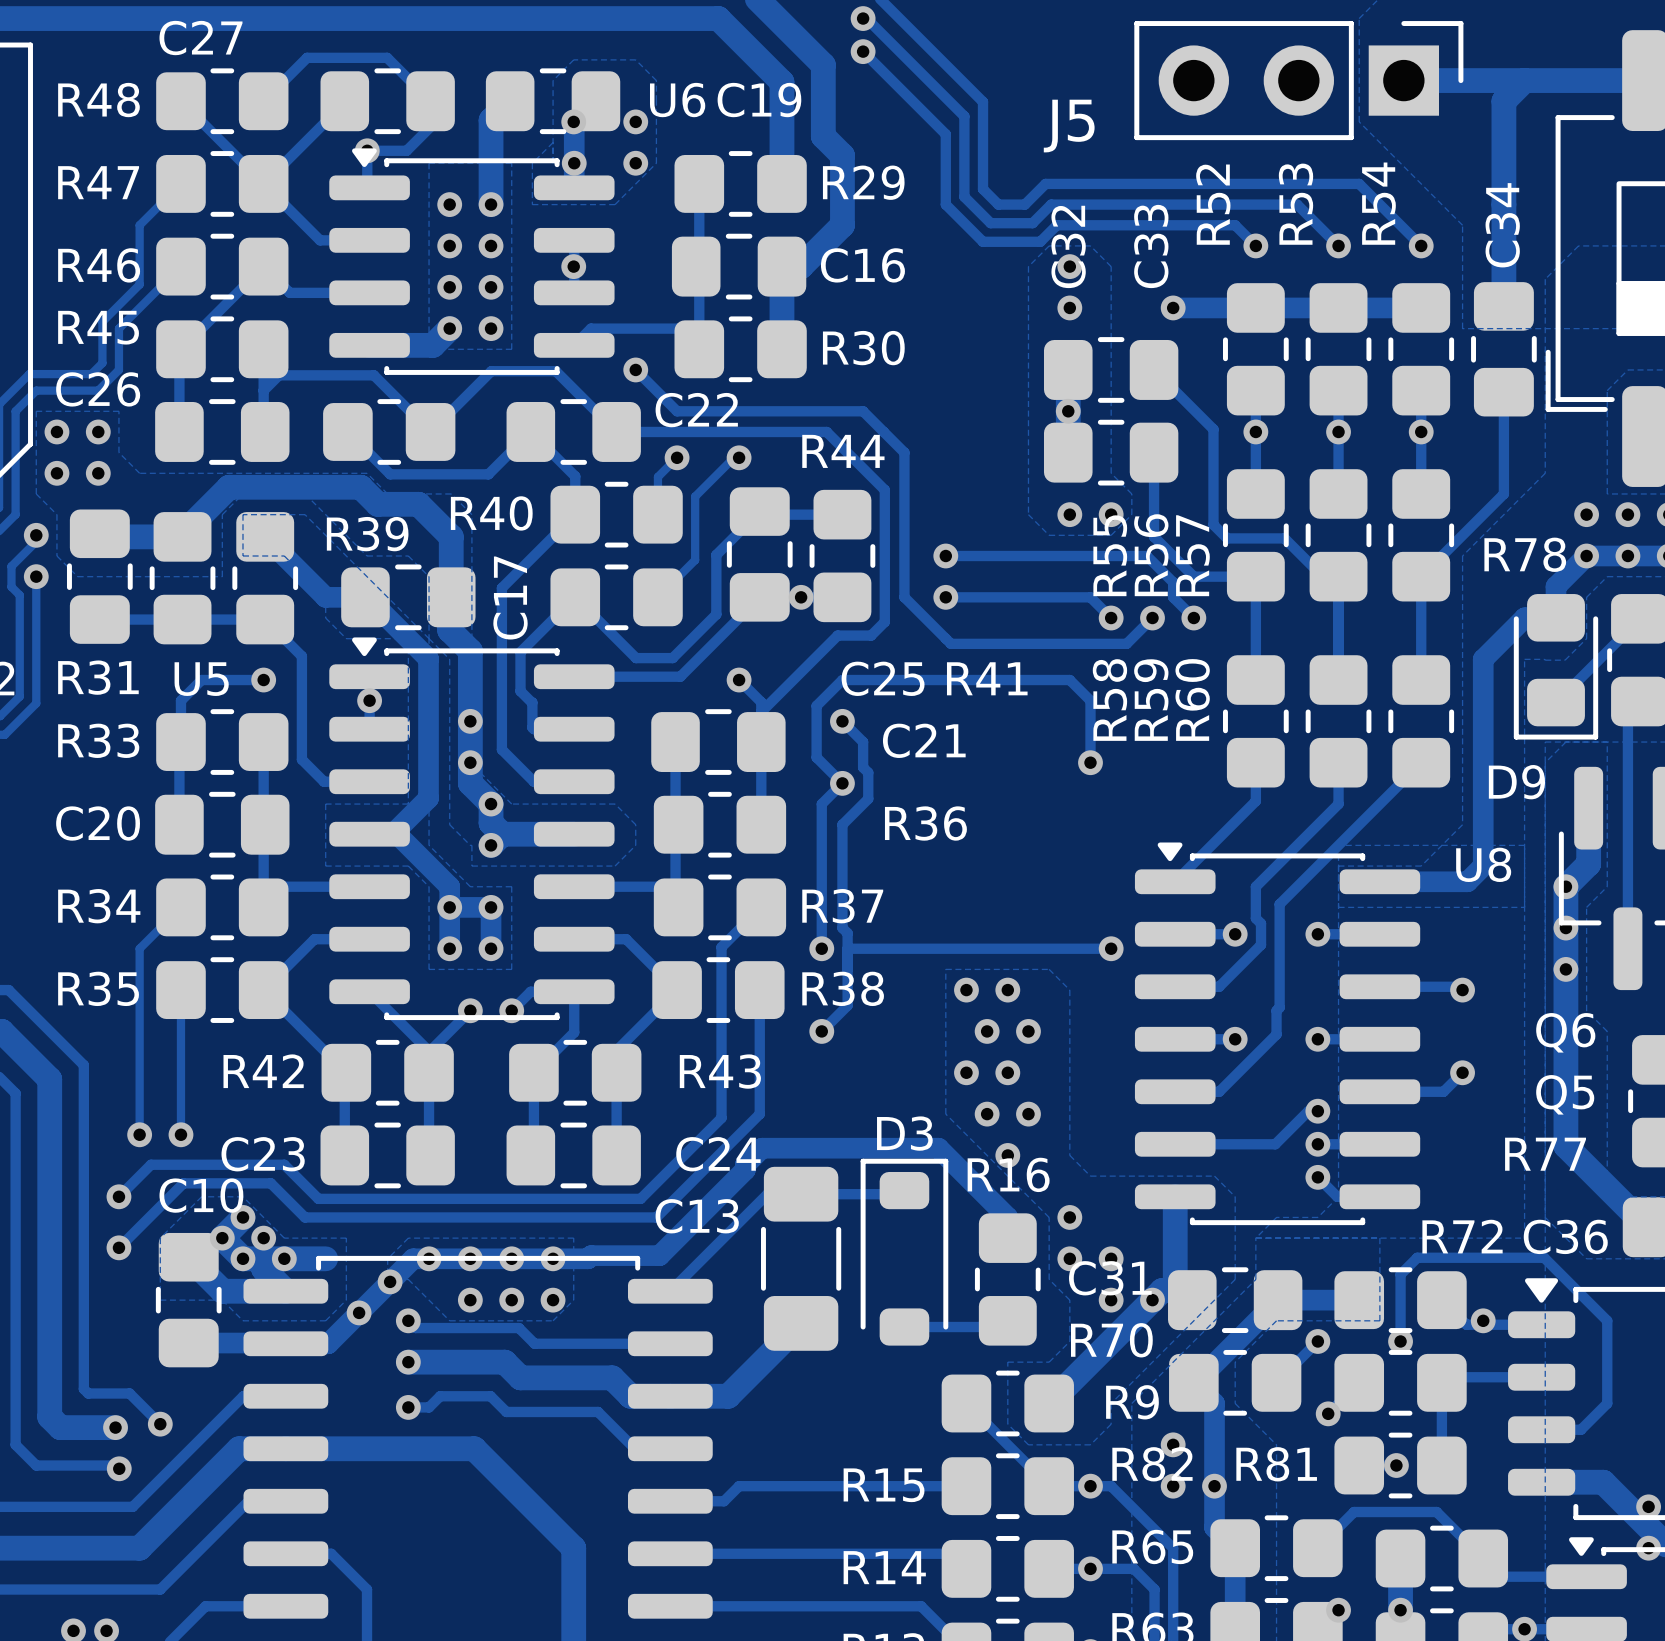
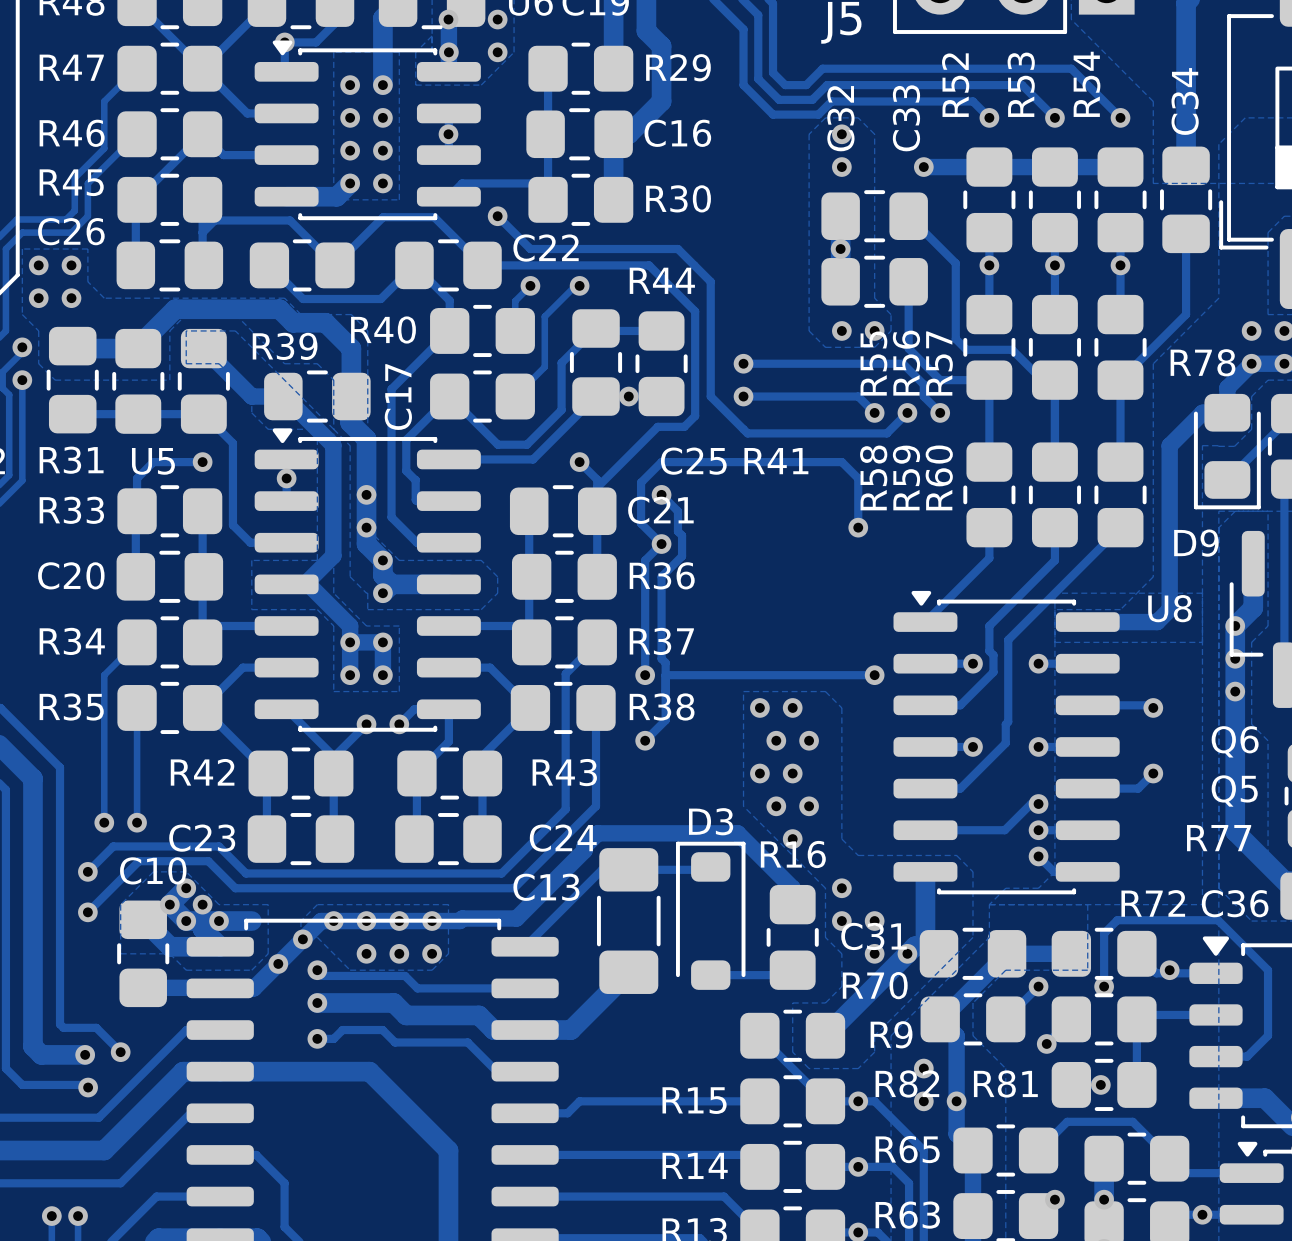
C21 name position: C21 (924, 740) -> C21 (660, 510)
R36 name position: R36 (925, 823) -> R36 (662, 575)

